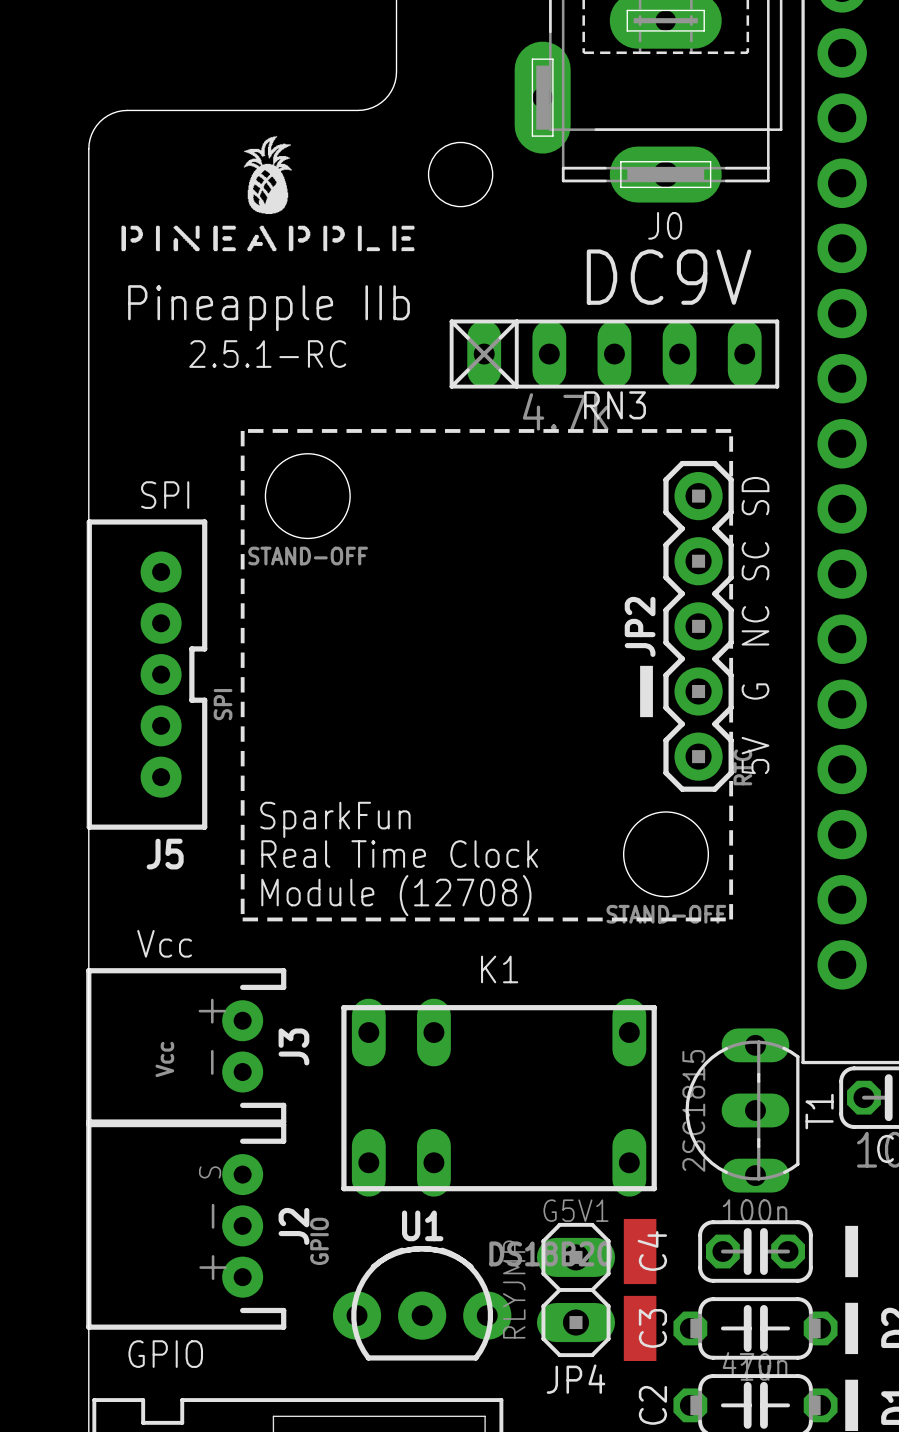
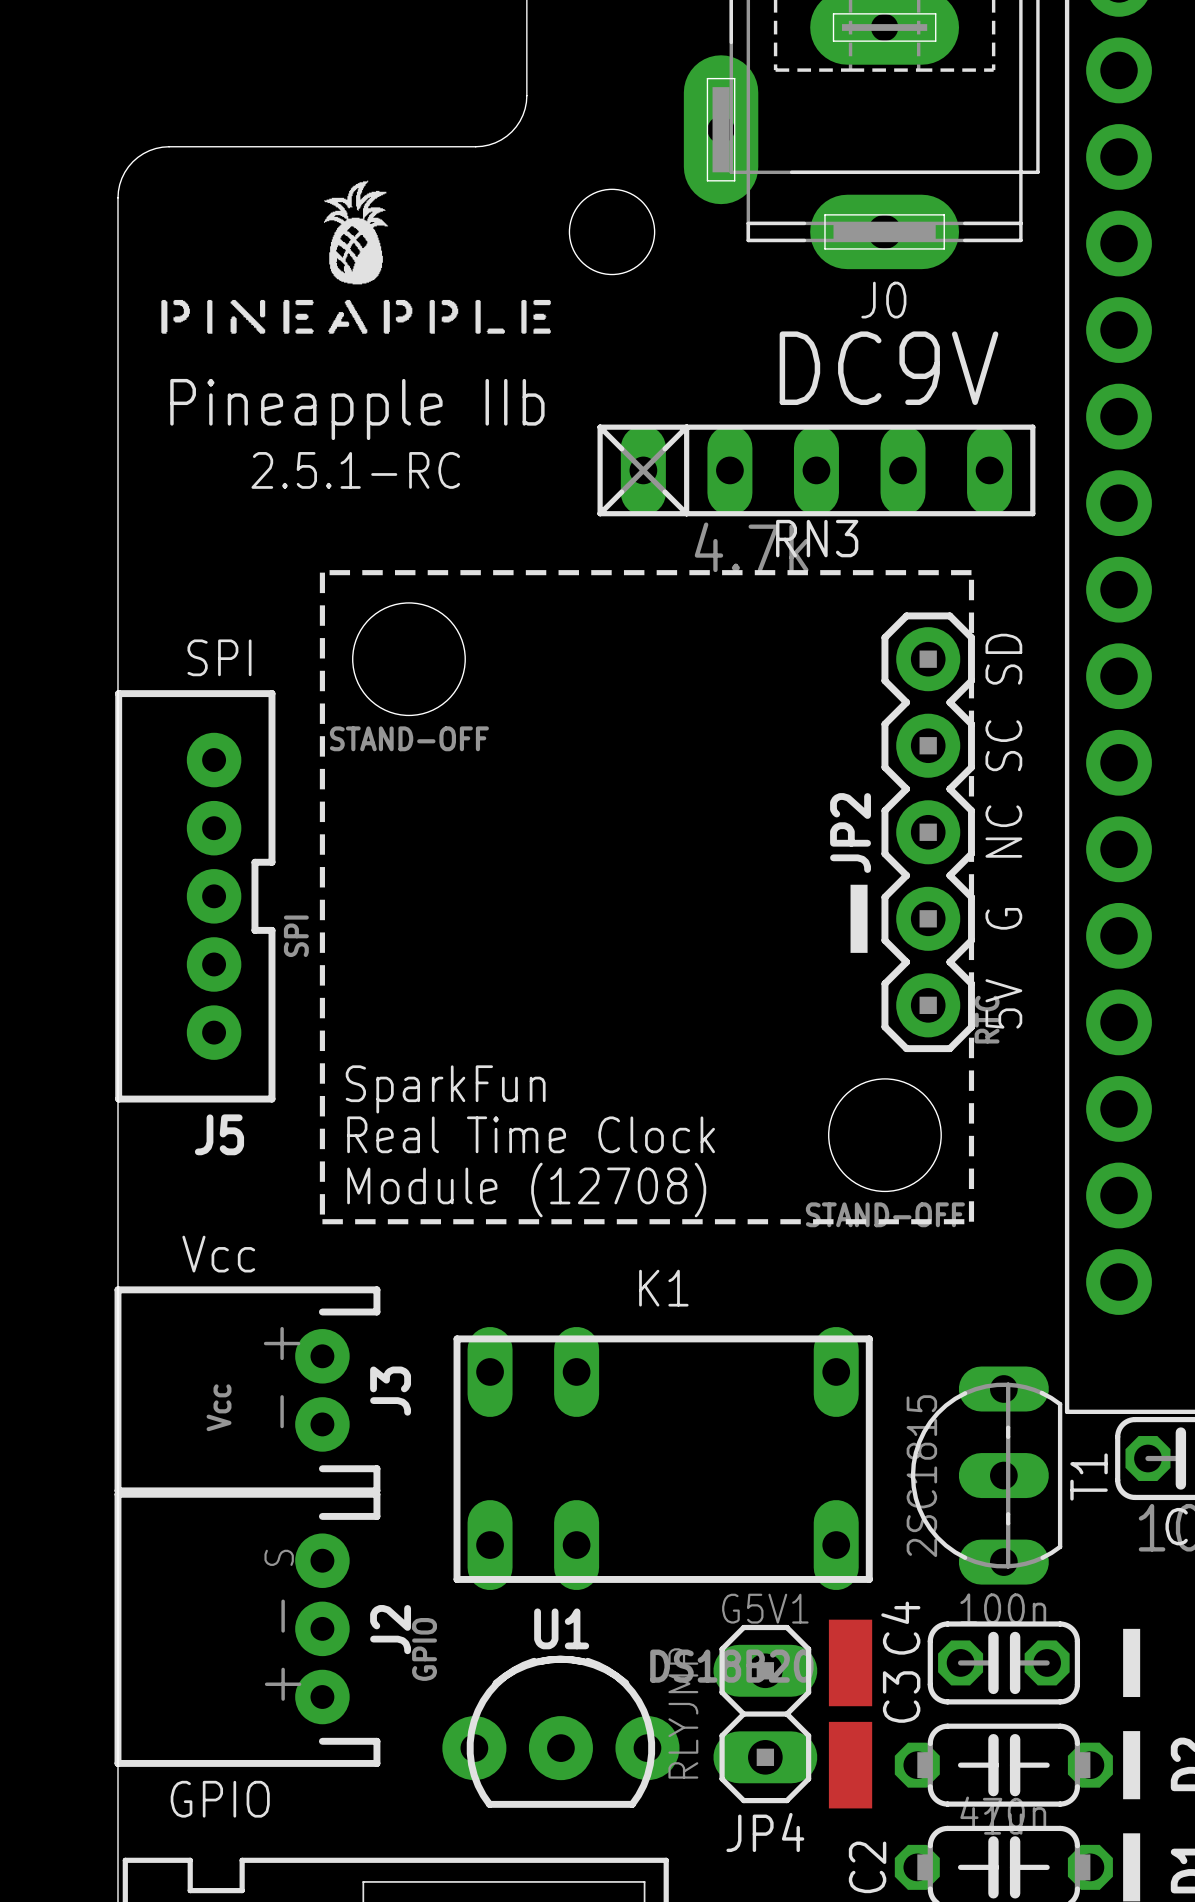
C4 name position: C4 (652, 1250) -> C4 (900, 1628)
C3 name position: C3 (652, 1328) -> C3 (901, 1697)

